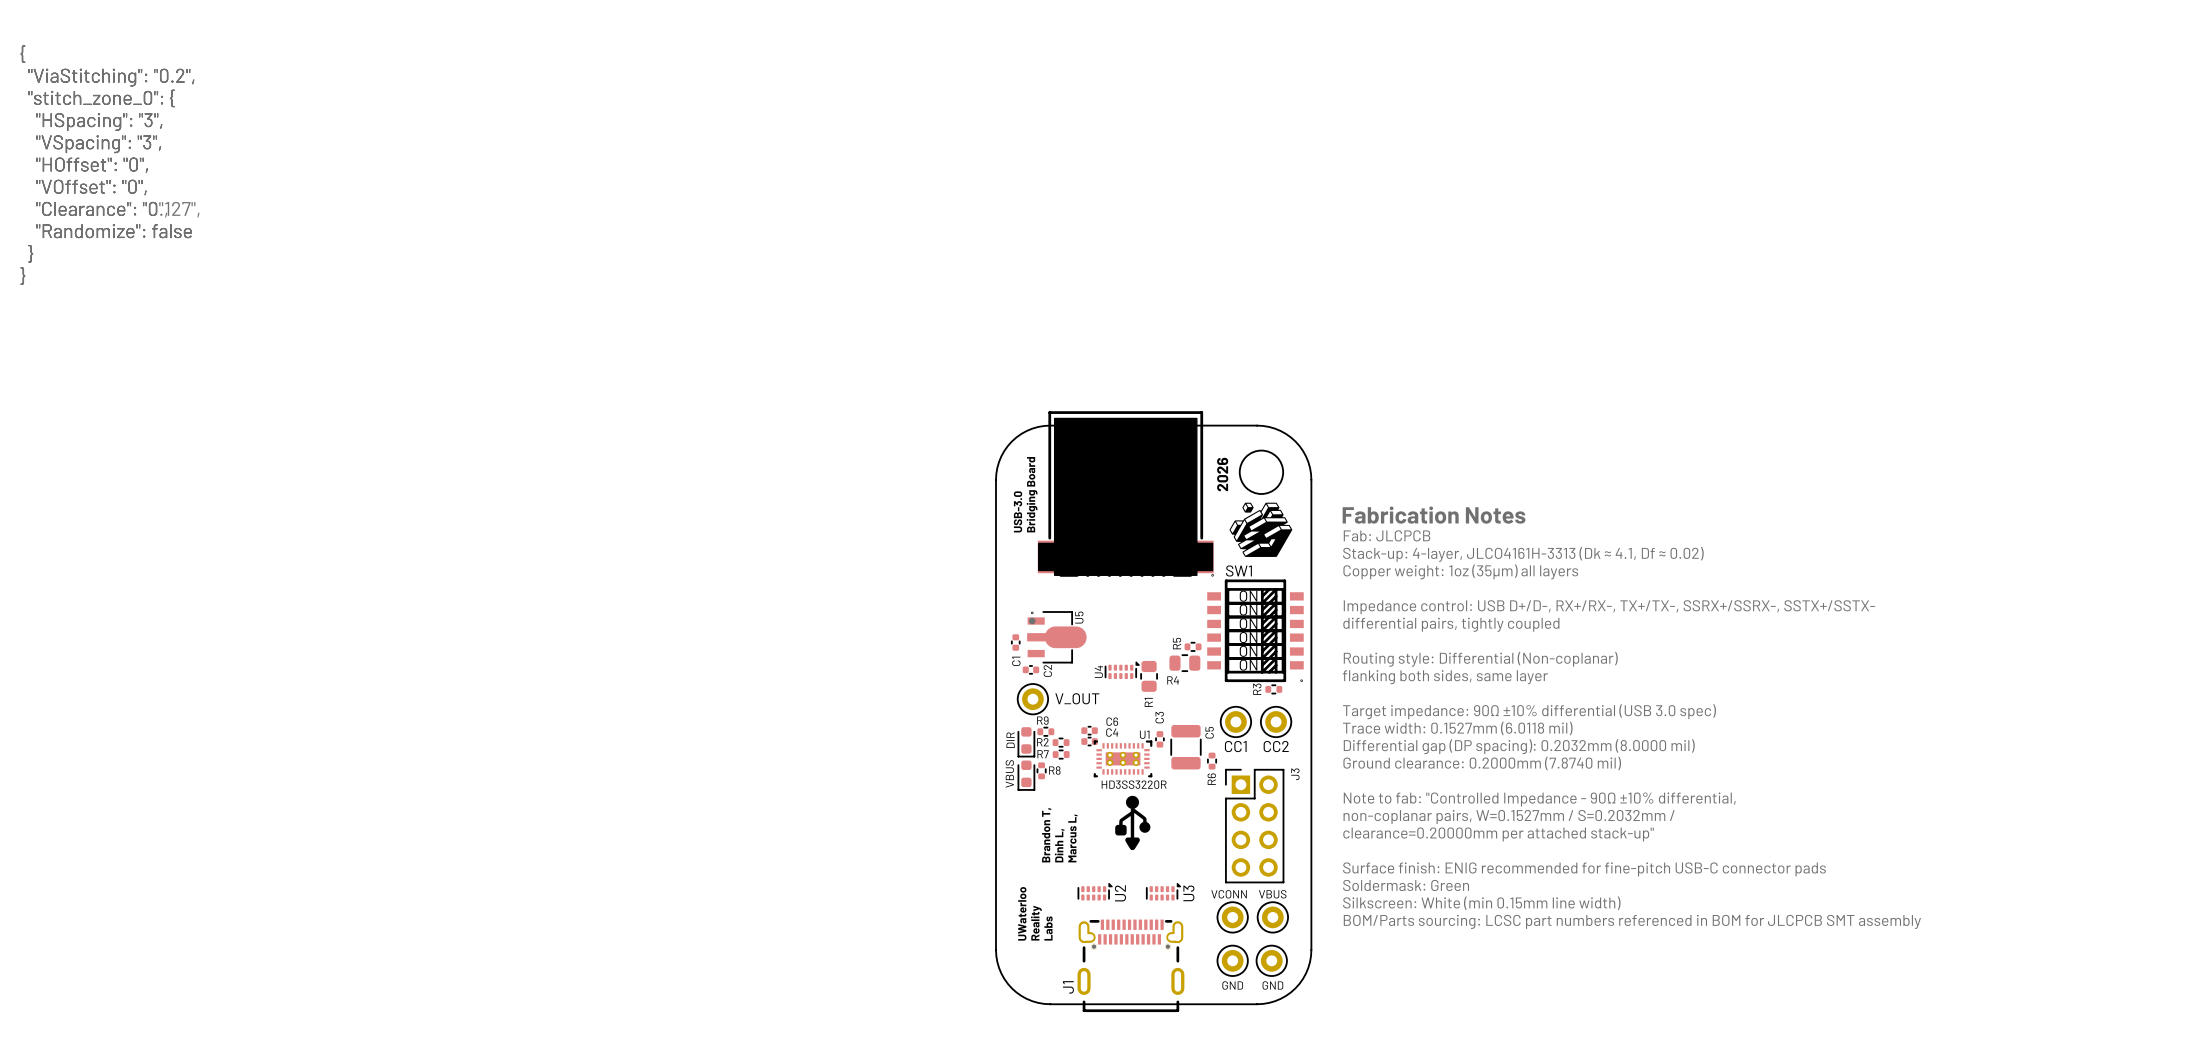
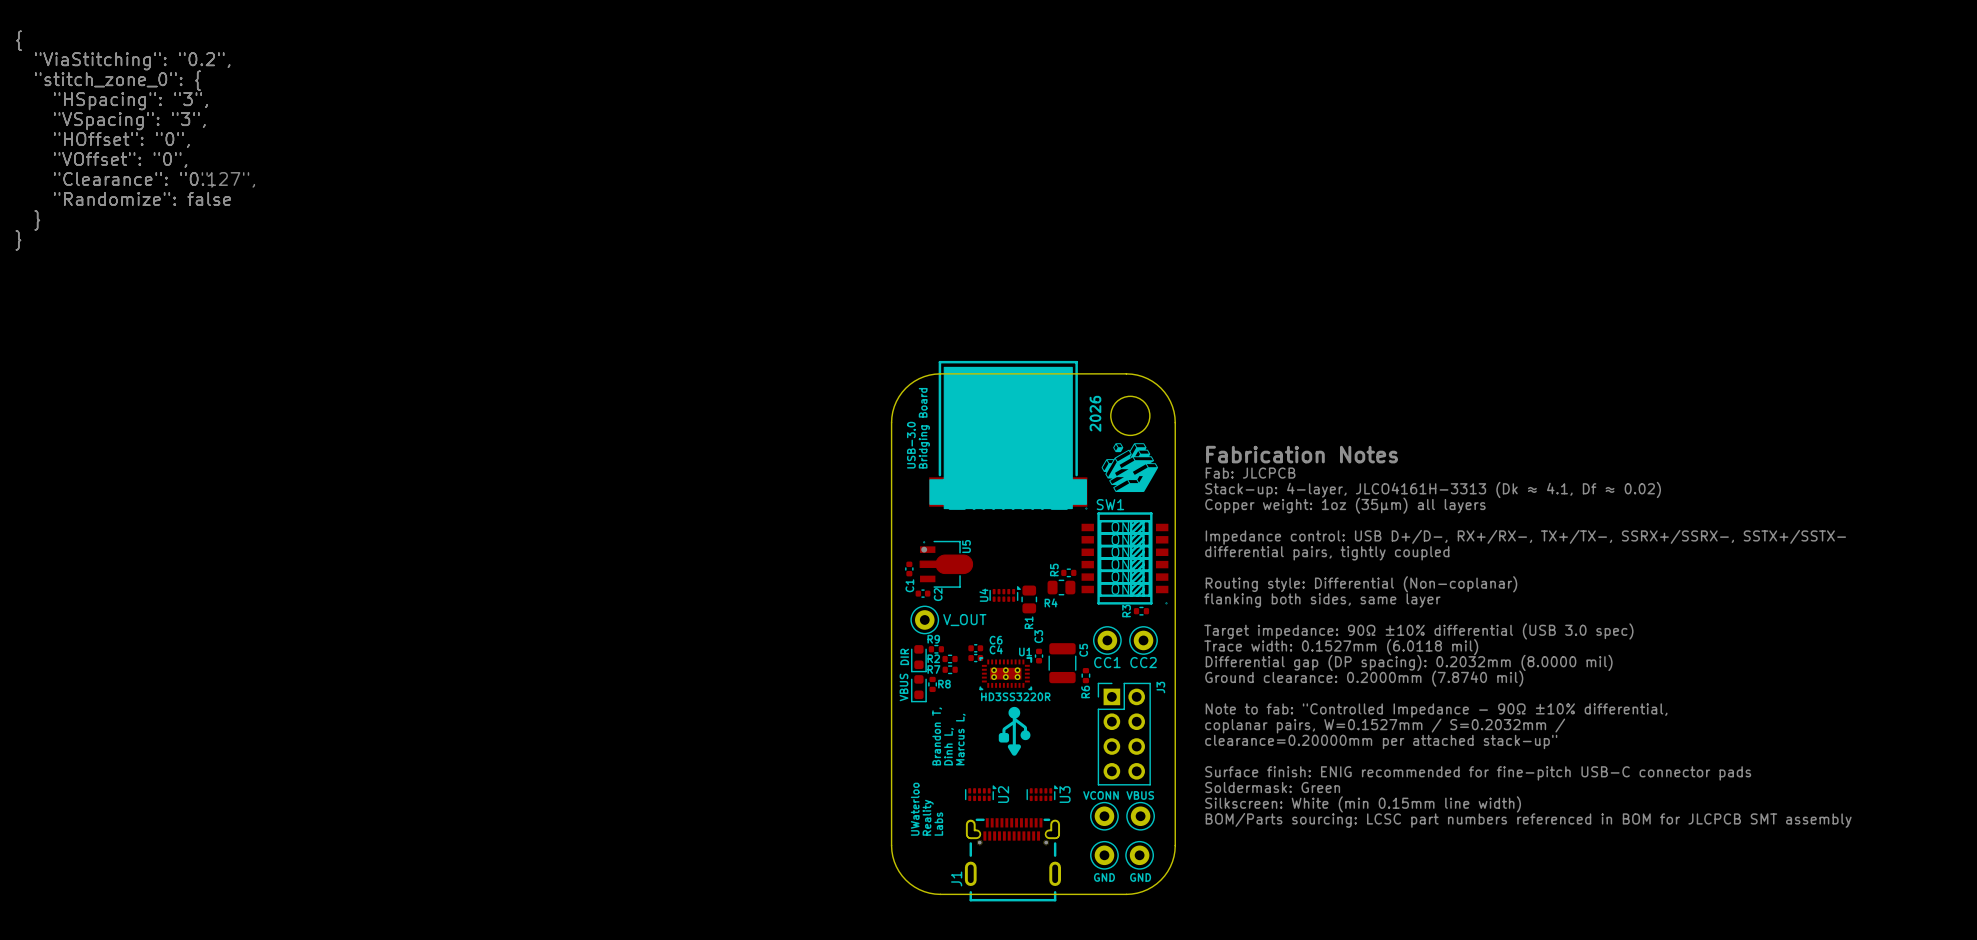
text: non-coplanar pairs, W=0.1527mm / S=0.2032mm / (1509, 816) -> coplanar pairs, W=0.1527mm / S=0.2032mm / (1385, 726)

